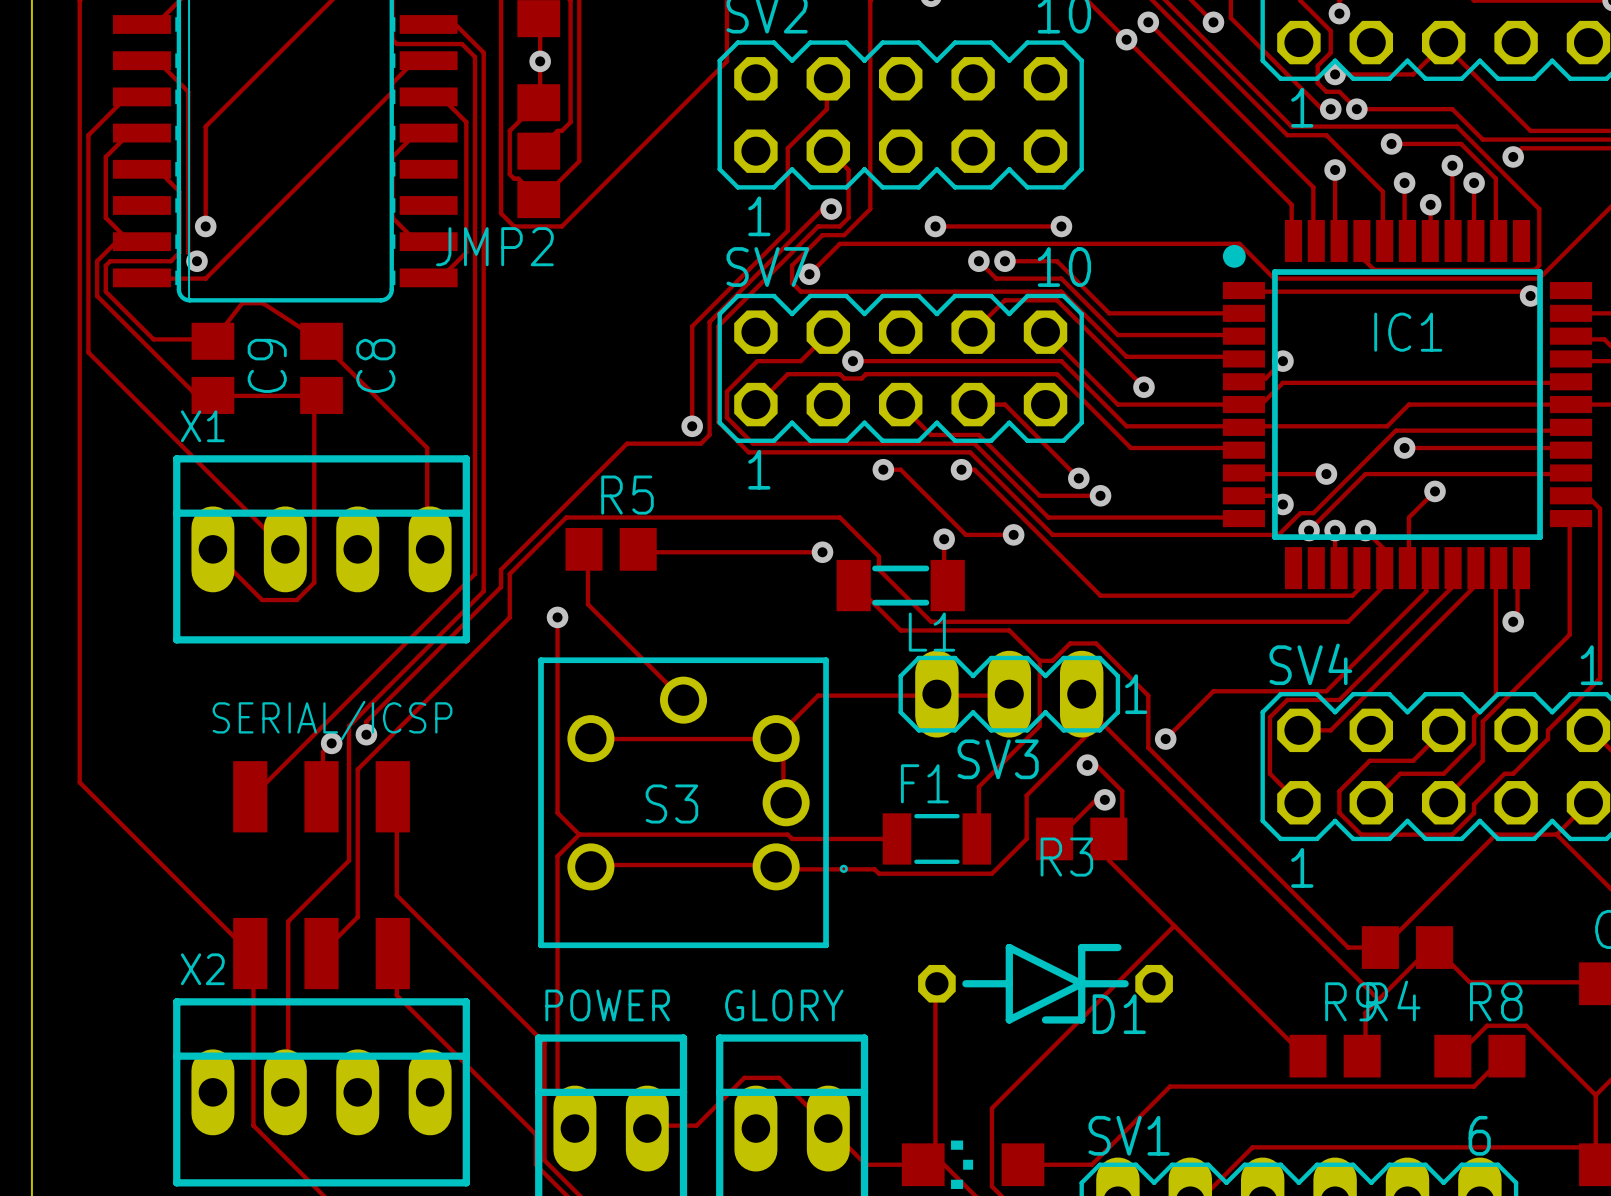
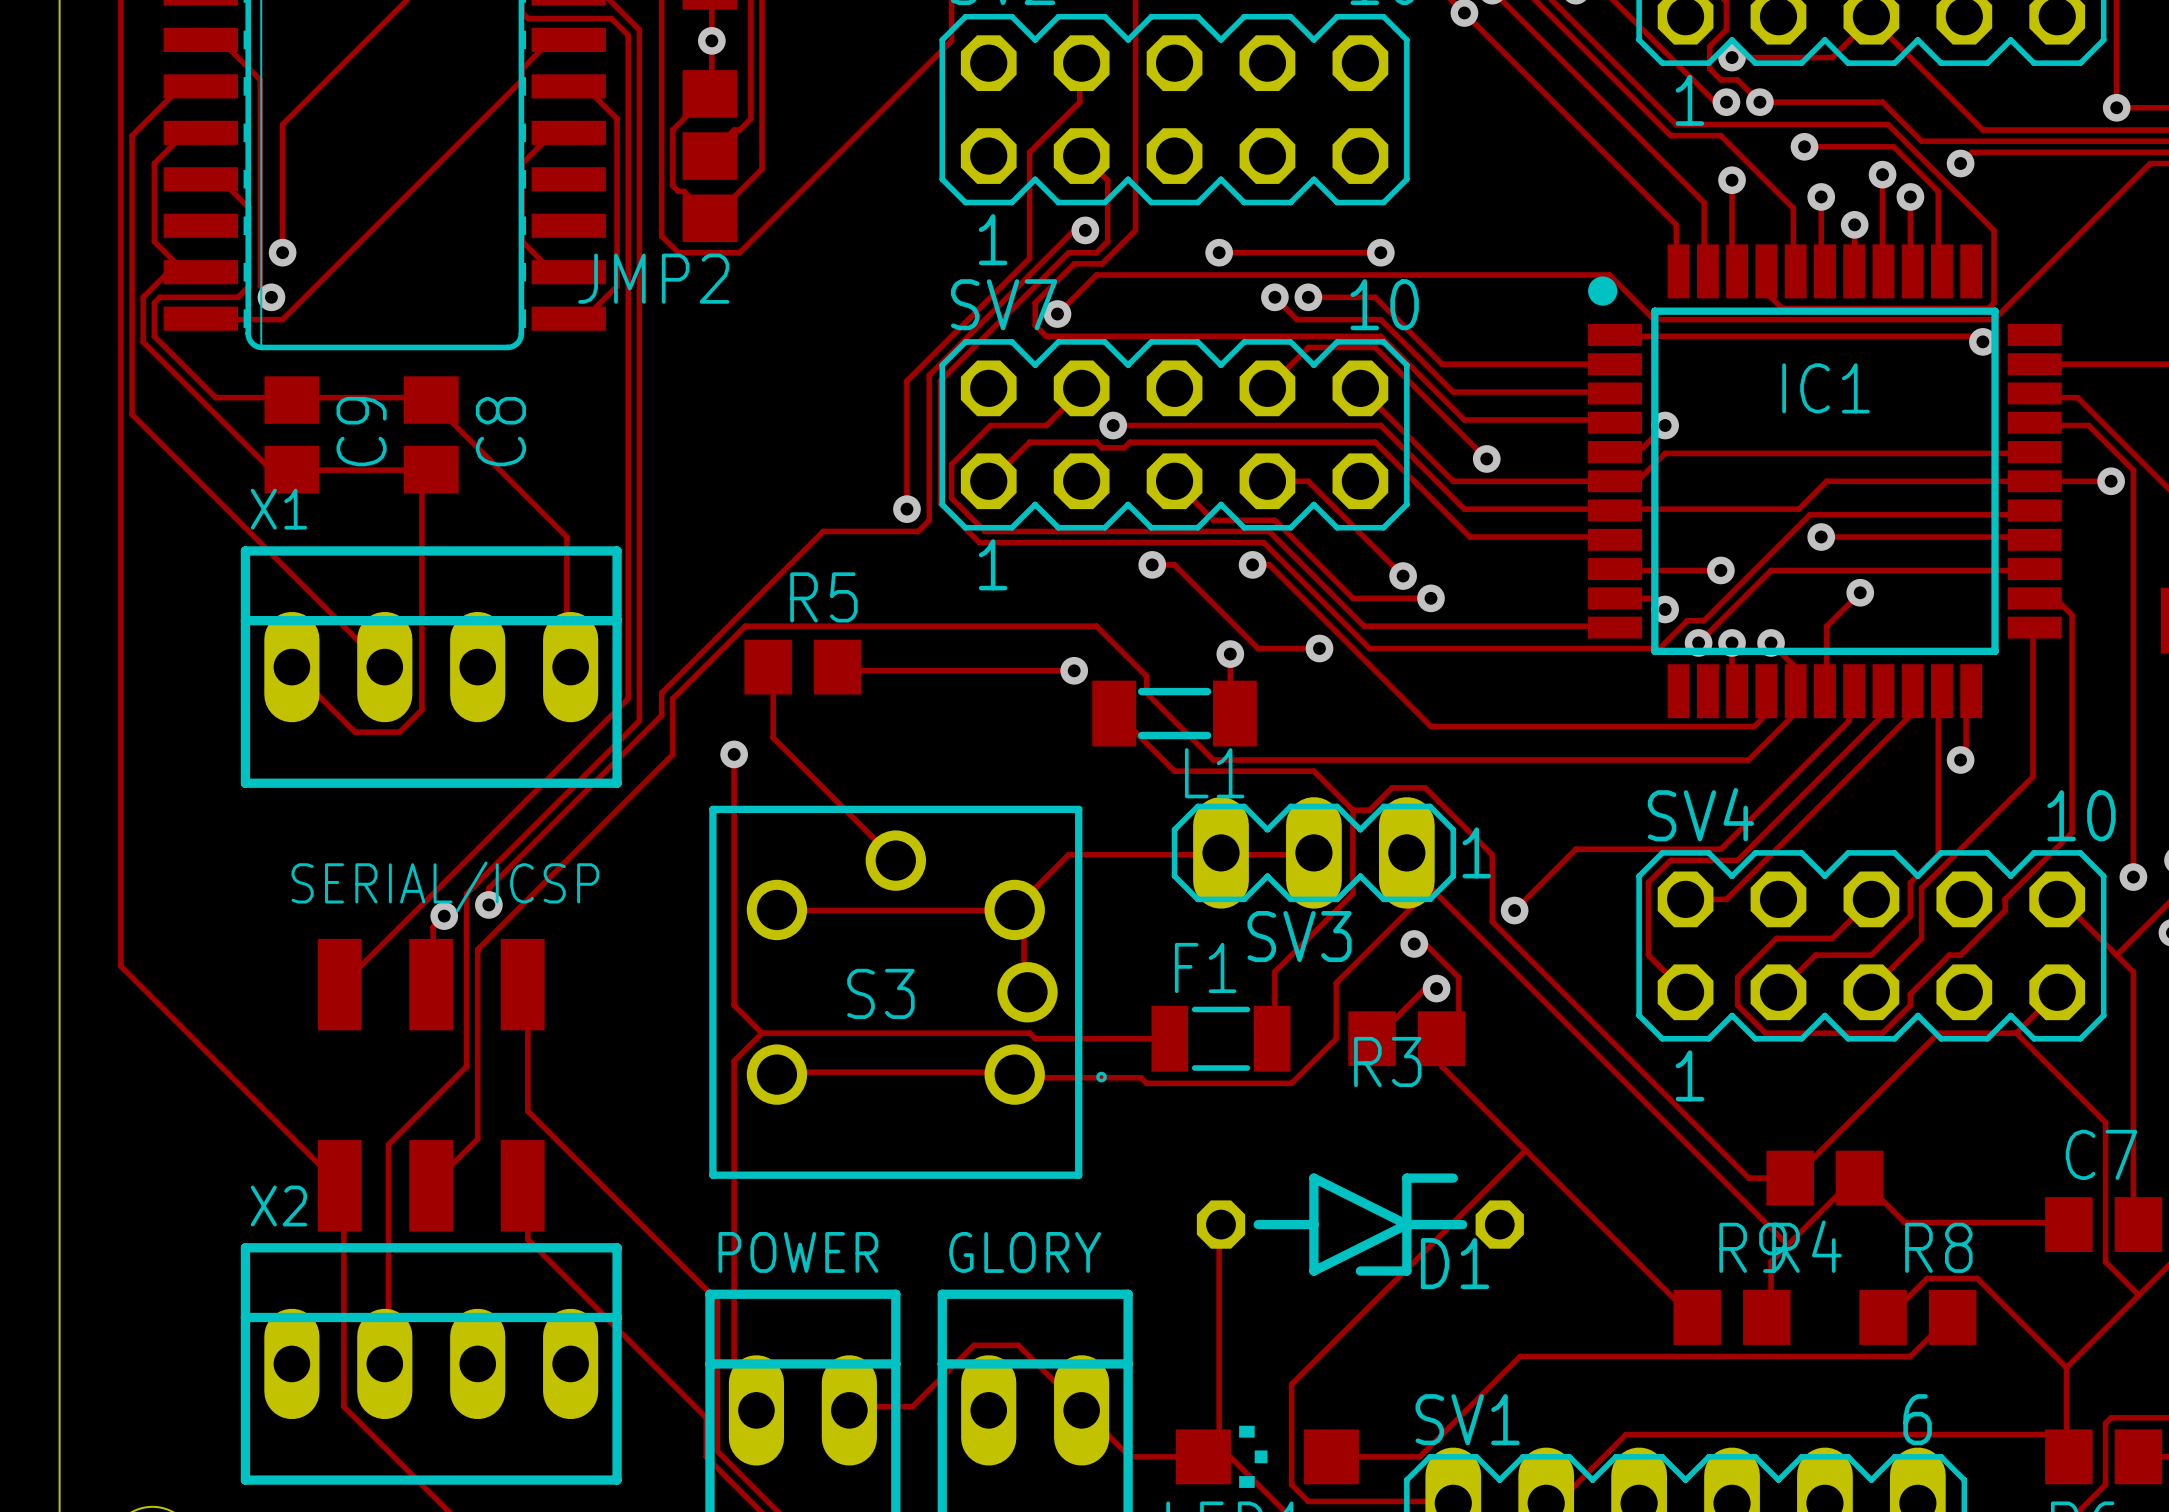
track: (214, 339) (242, 303) (262, 303) (318, 339) -> (293, 397) (427, 397)

